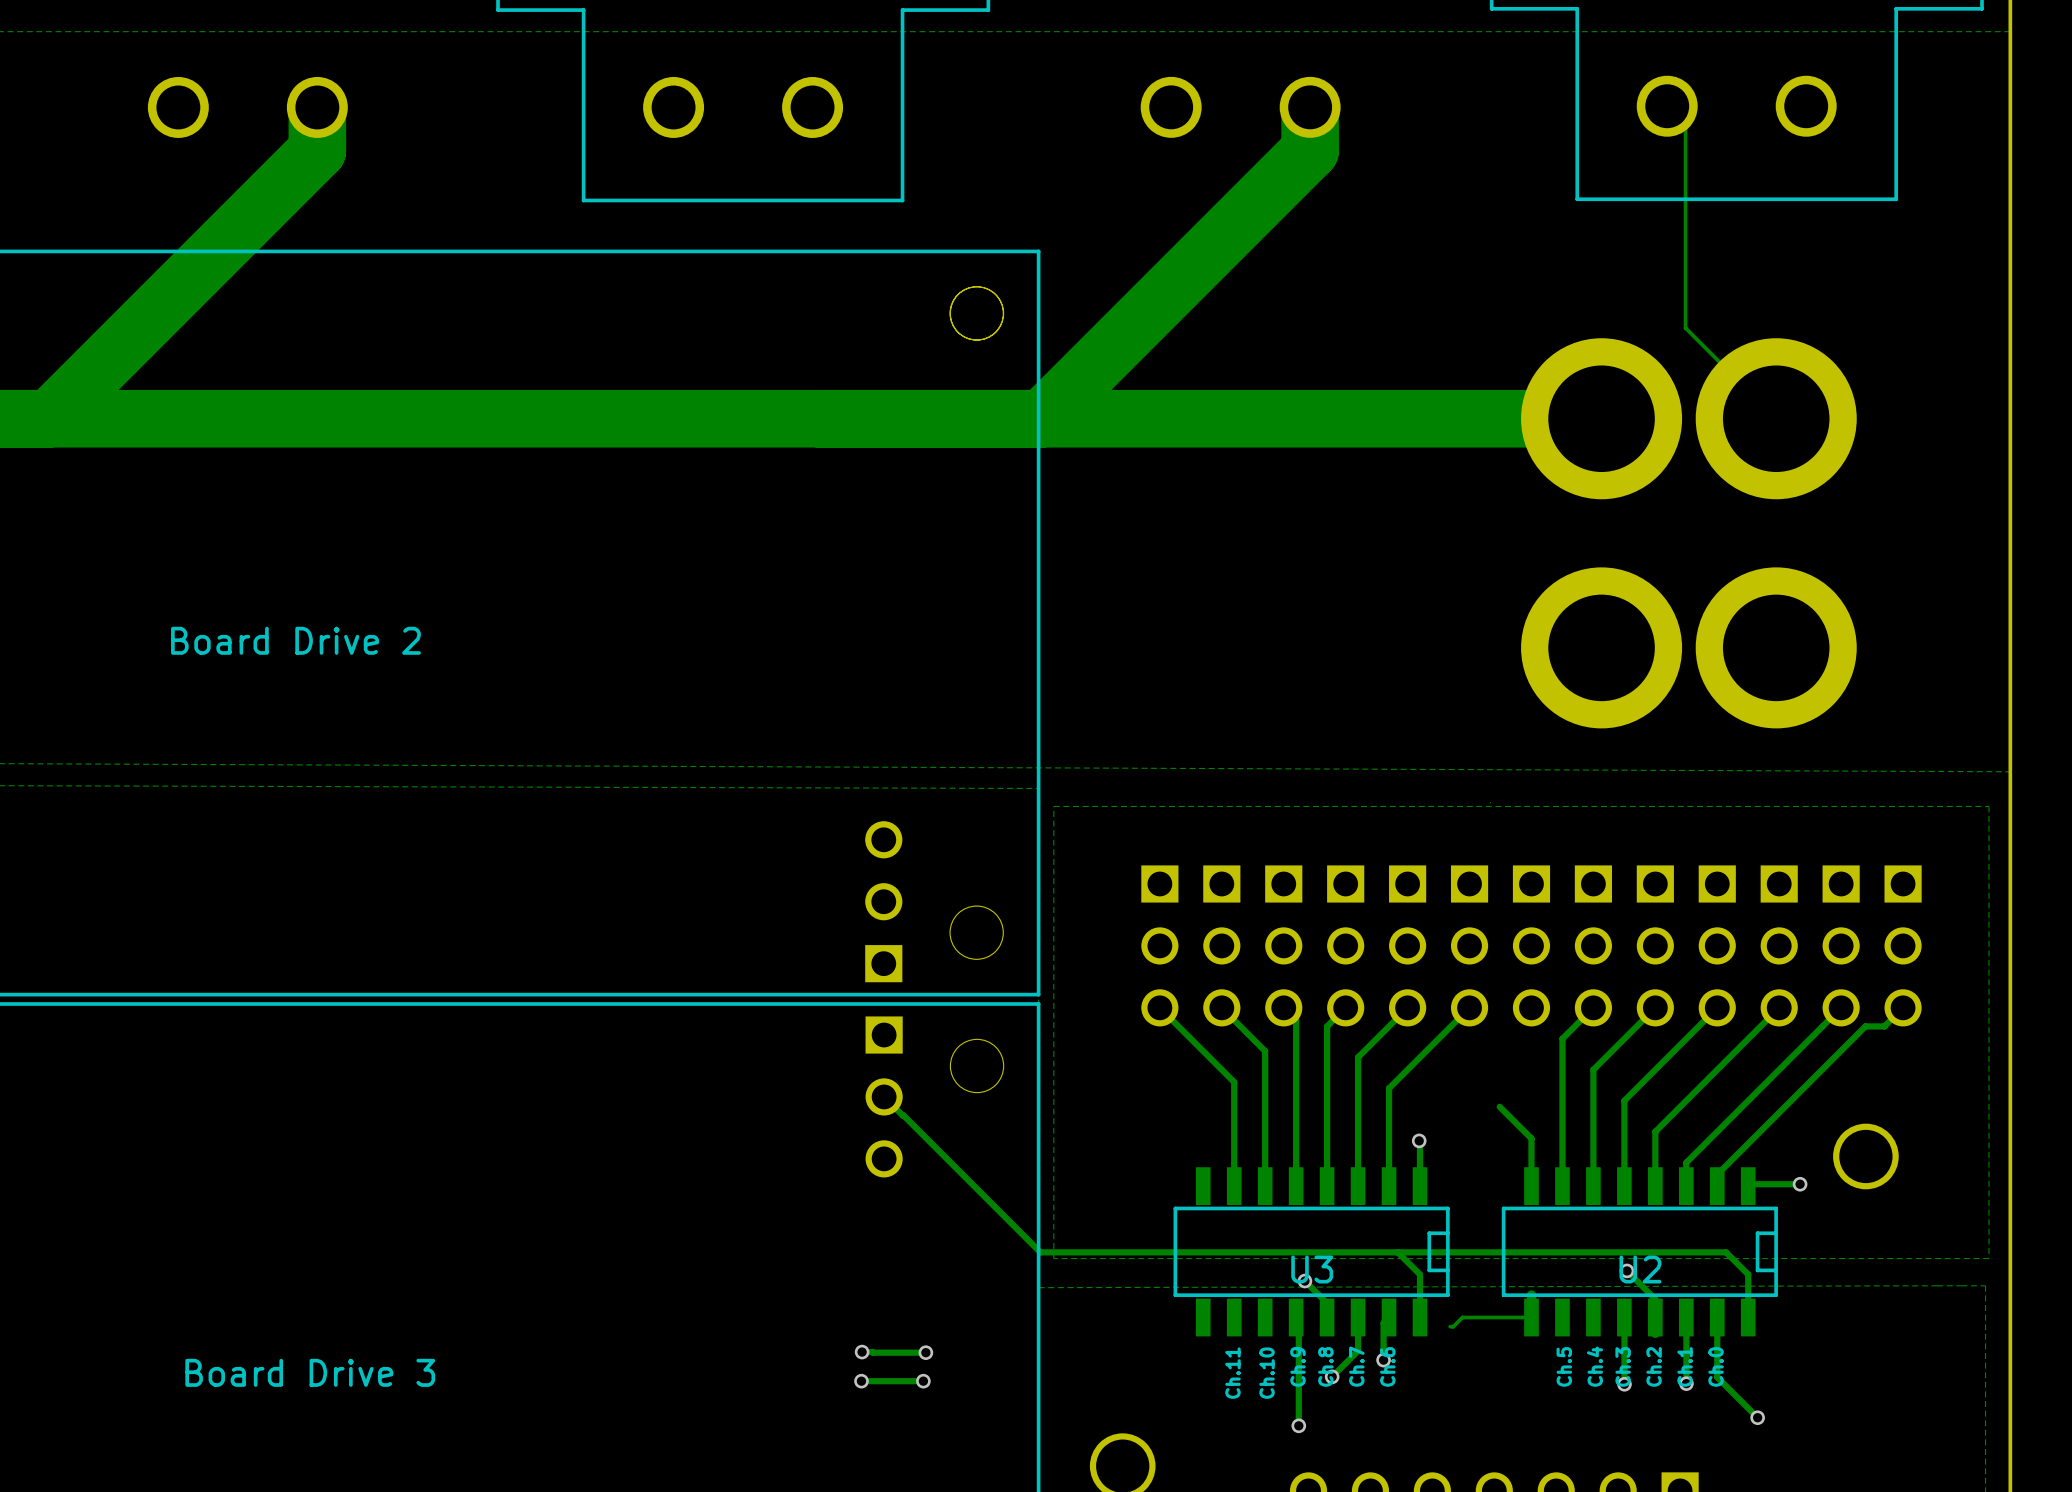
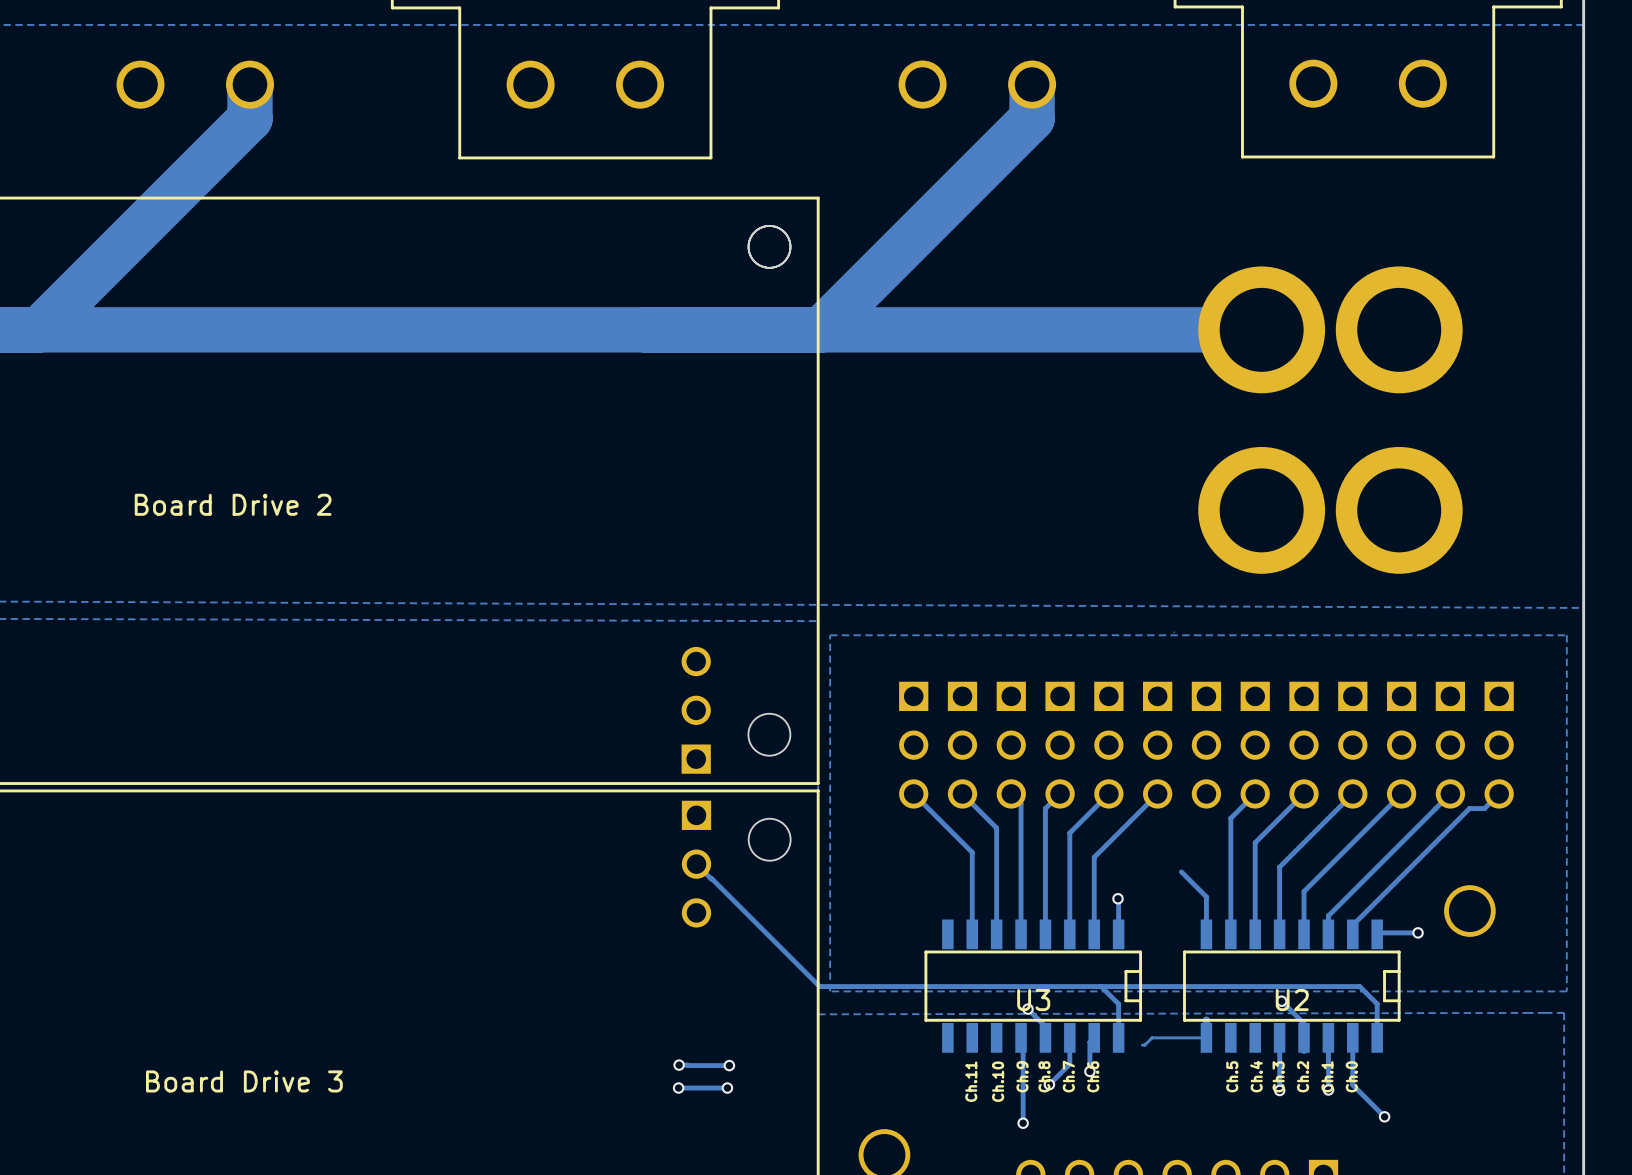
track: (1685, 105) (1685, 328) (1776, 418) -> none

